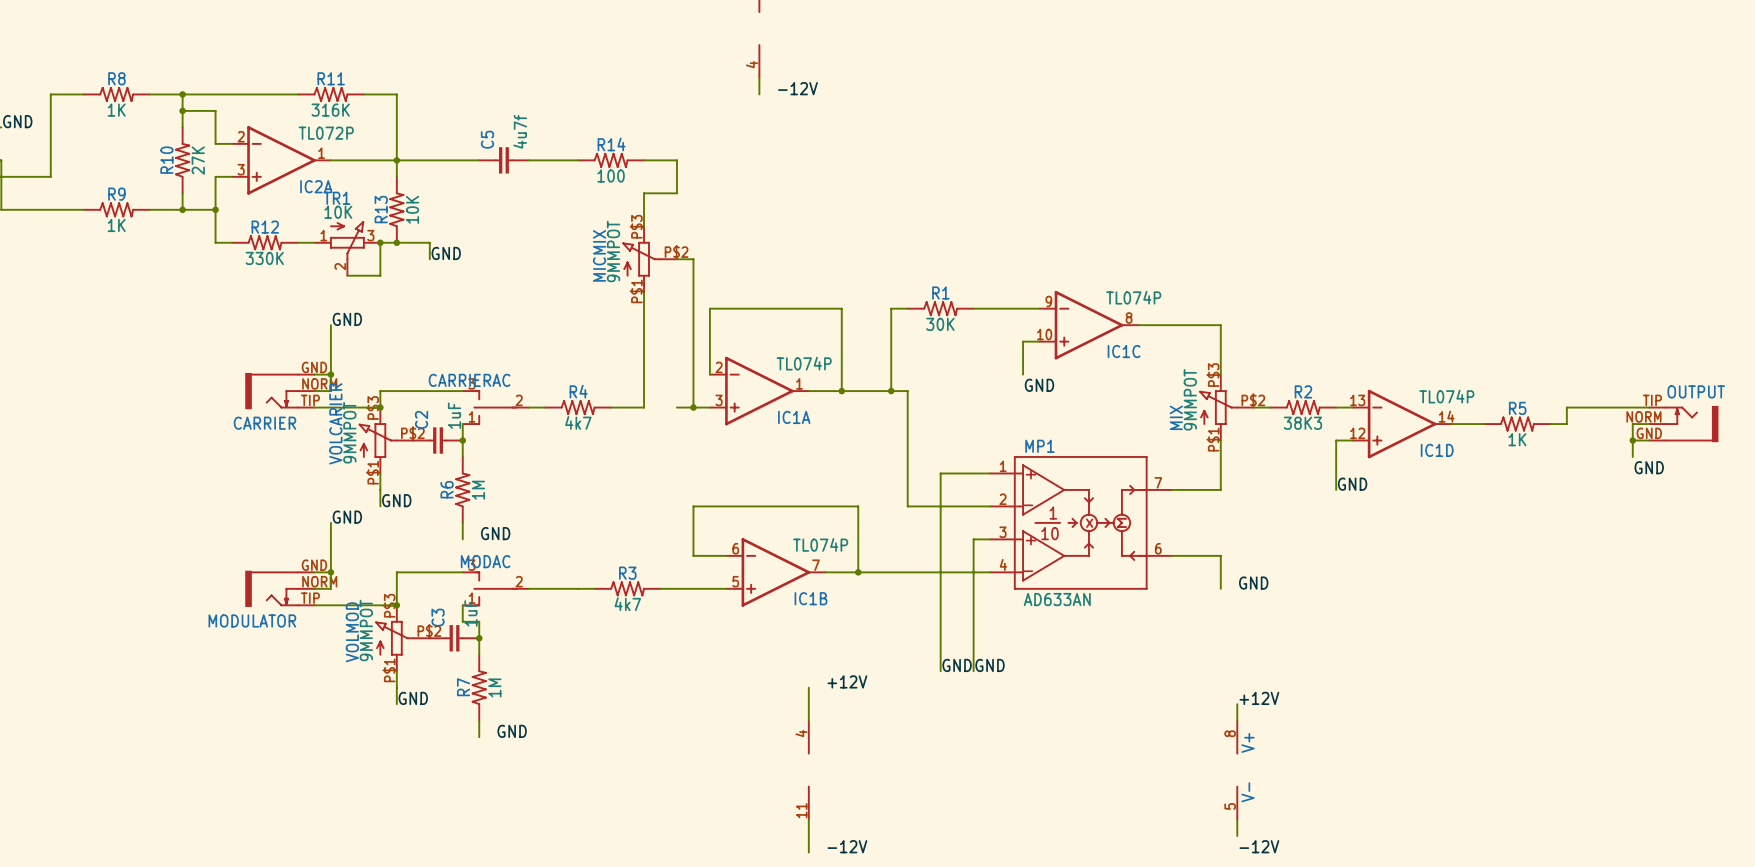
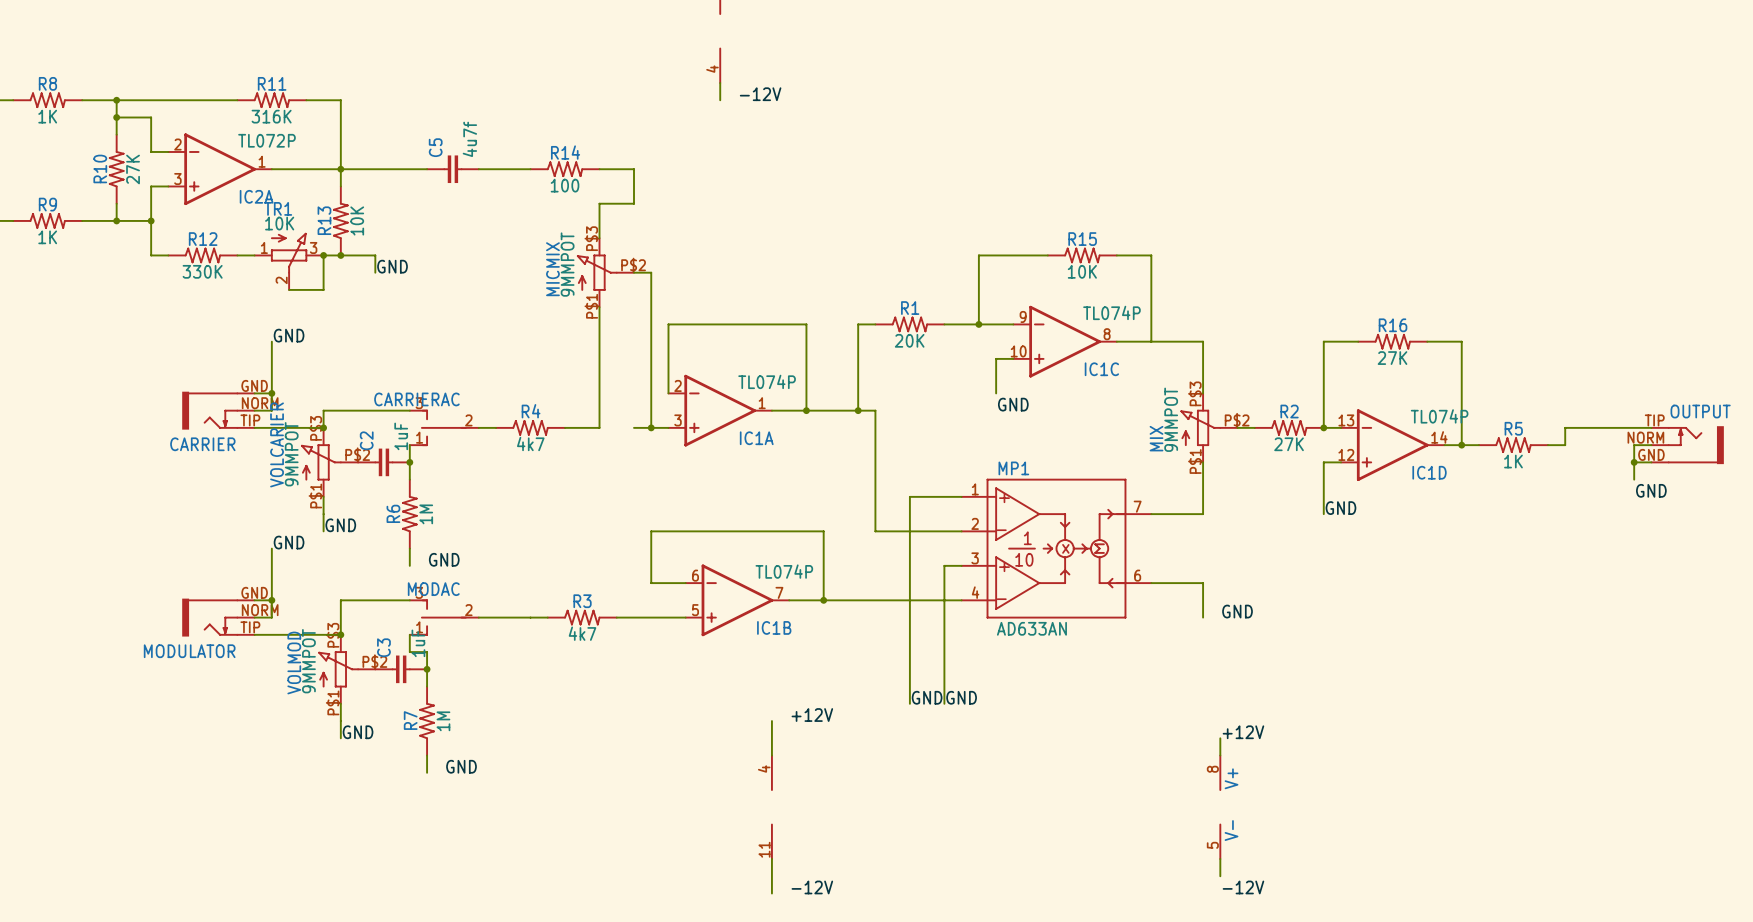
wire: none -> (1047, 255) (978, 255) (978, 324)
R15: none -> 10K (1082, 255)
wire: none -> (1116, 255) (1151, 255) (1151, 341)
junction: none -> (978, 324)
R1 value: 30K (940, 324) -> 20K (909, 340)
wire: none -> (1358, 341) (1323, 341) (1323, 427)
R16: none -> 27K (1392, 341)
wire: none -> (1427, 341) (1461, 341) (1461, 445)
junction: none -> (1323, 427)
R2 value: 38K3 (1302, 423) -> 27K (1289, 444)
junction: none -> (1461, 445)

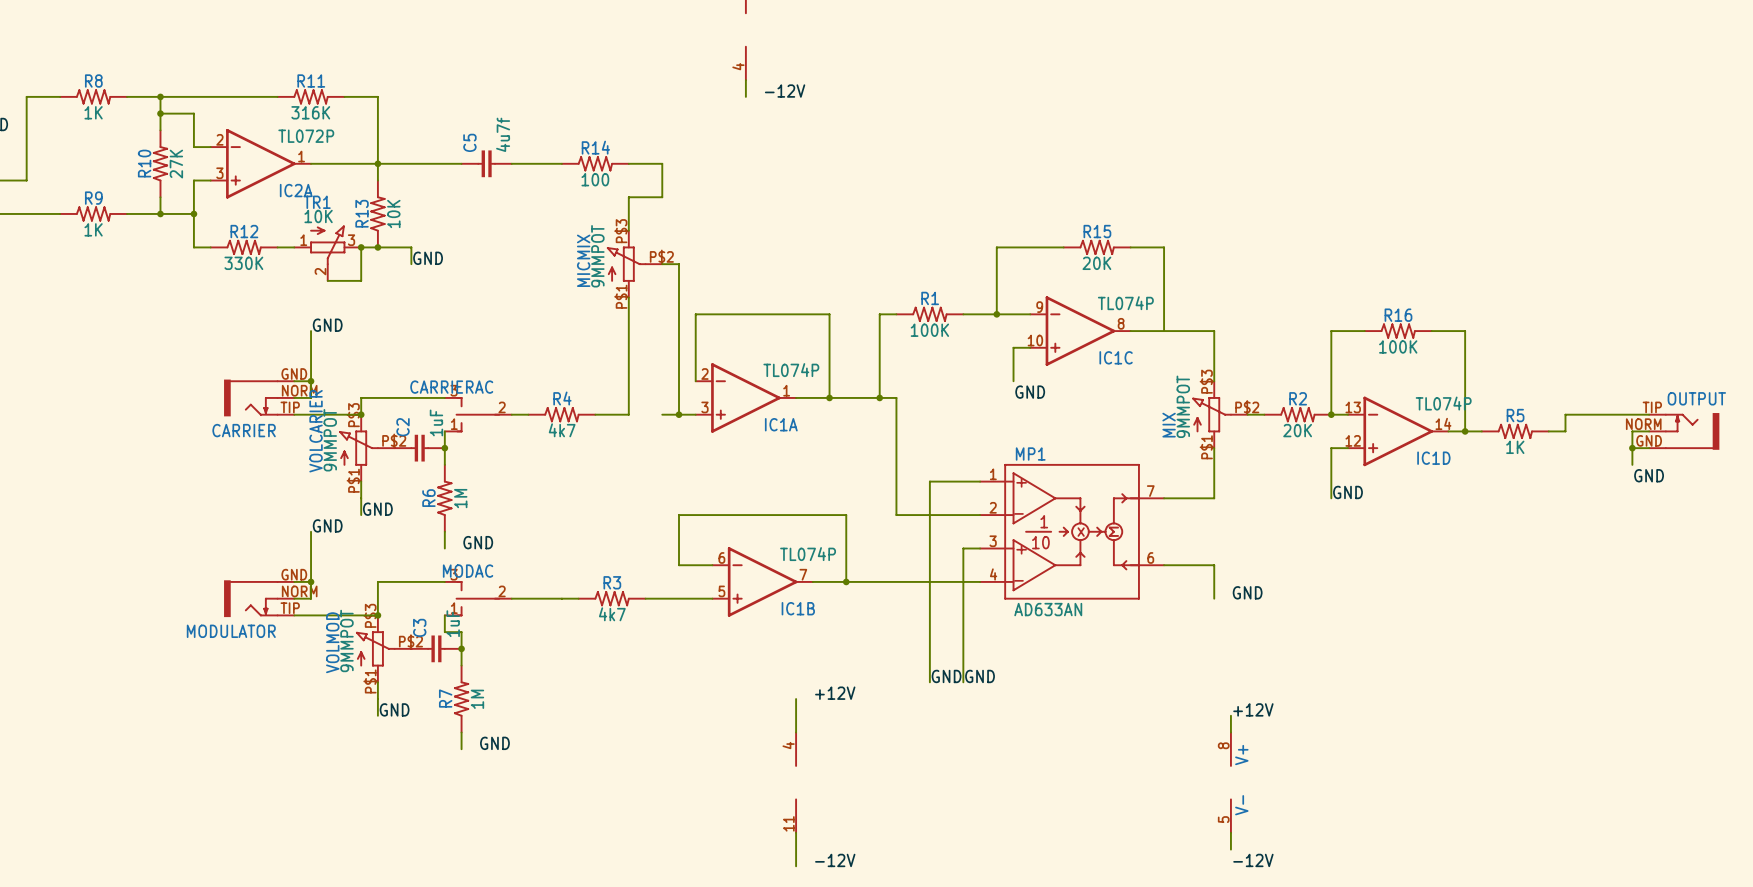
R15 value: 10K (1082, 271) -> 20K (1096, 263)
R1 value: 20K (909, 340) -> 100K (929, 330)
R16 value: 27K (1392, 358) -> 100K (1398, 346)
R2 value: 27K (1289, 444) -> 20K (1297, 430)

